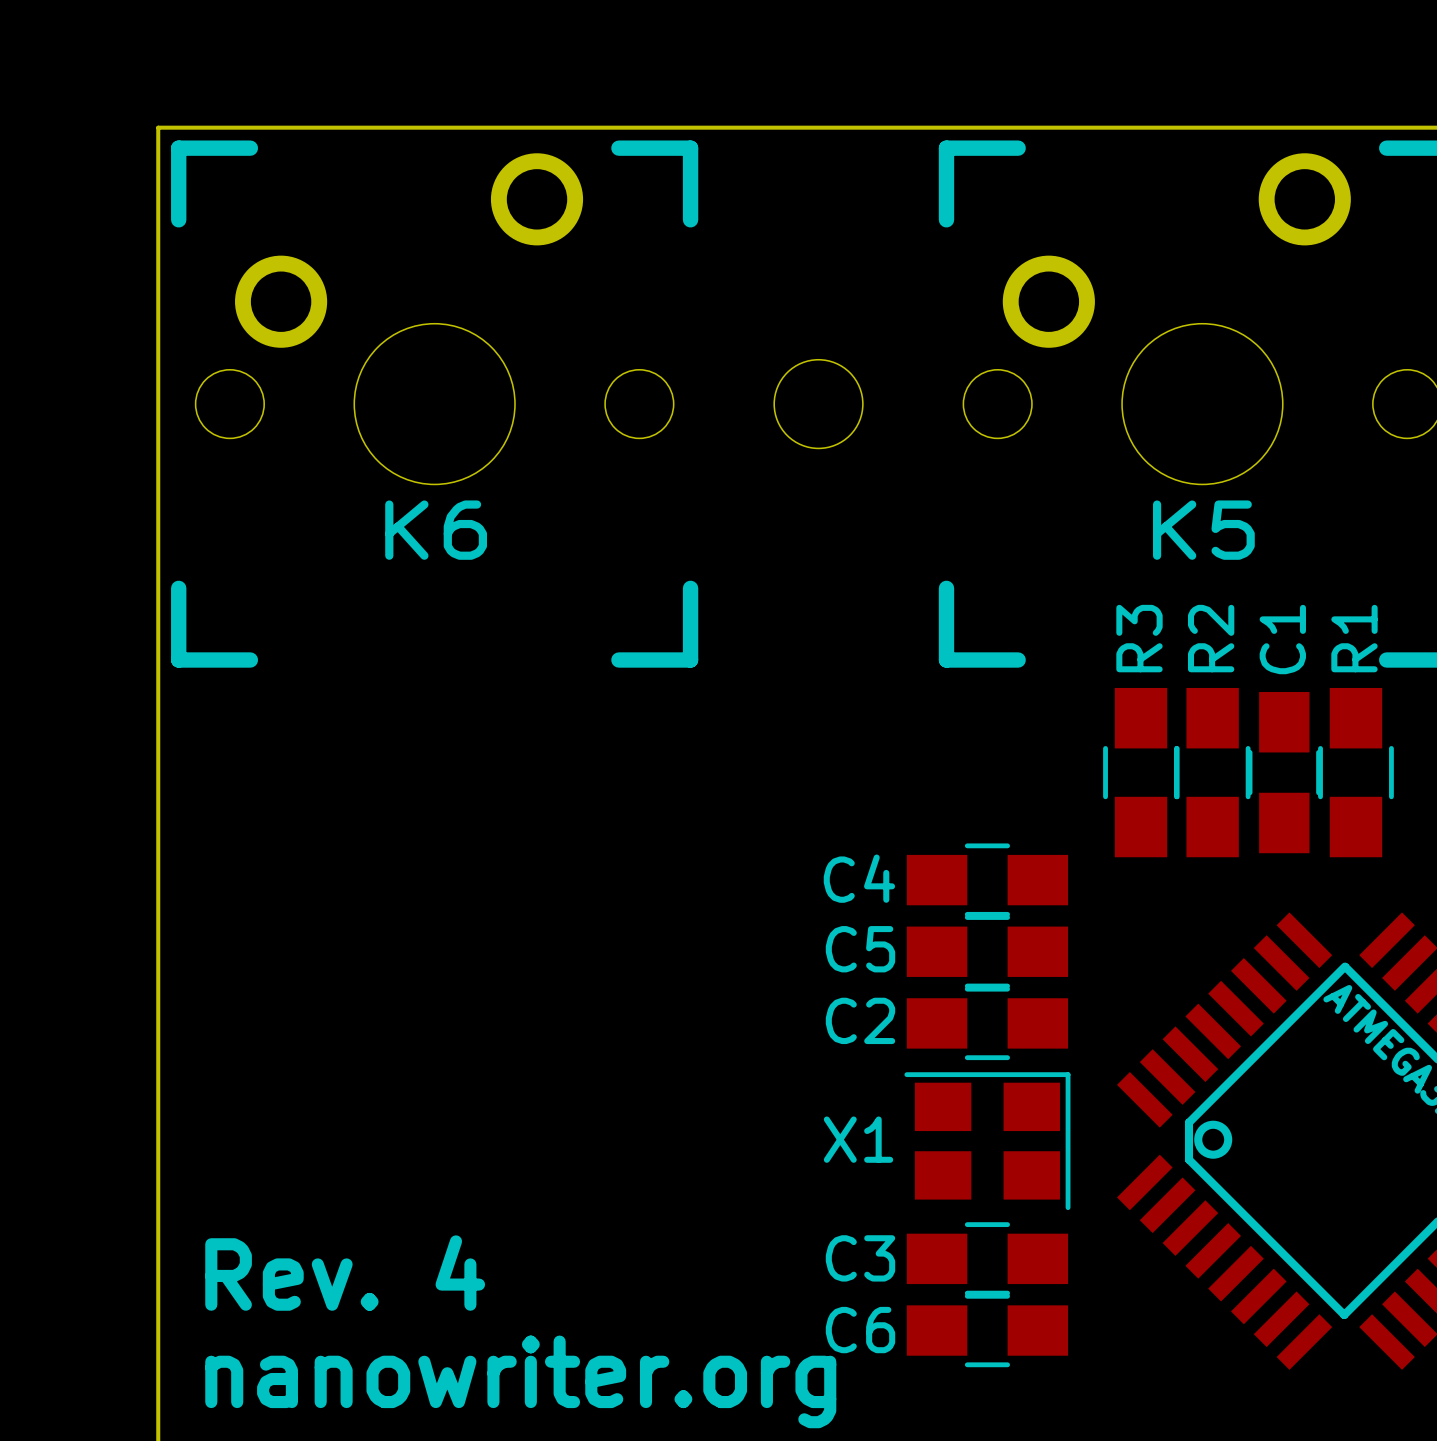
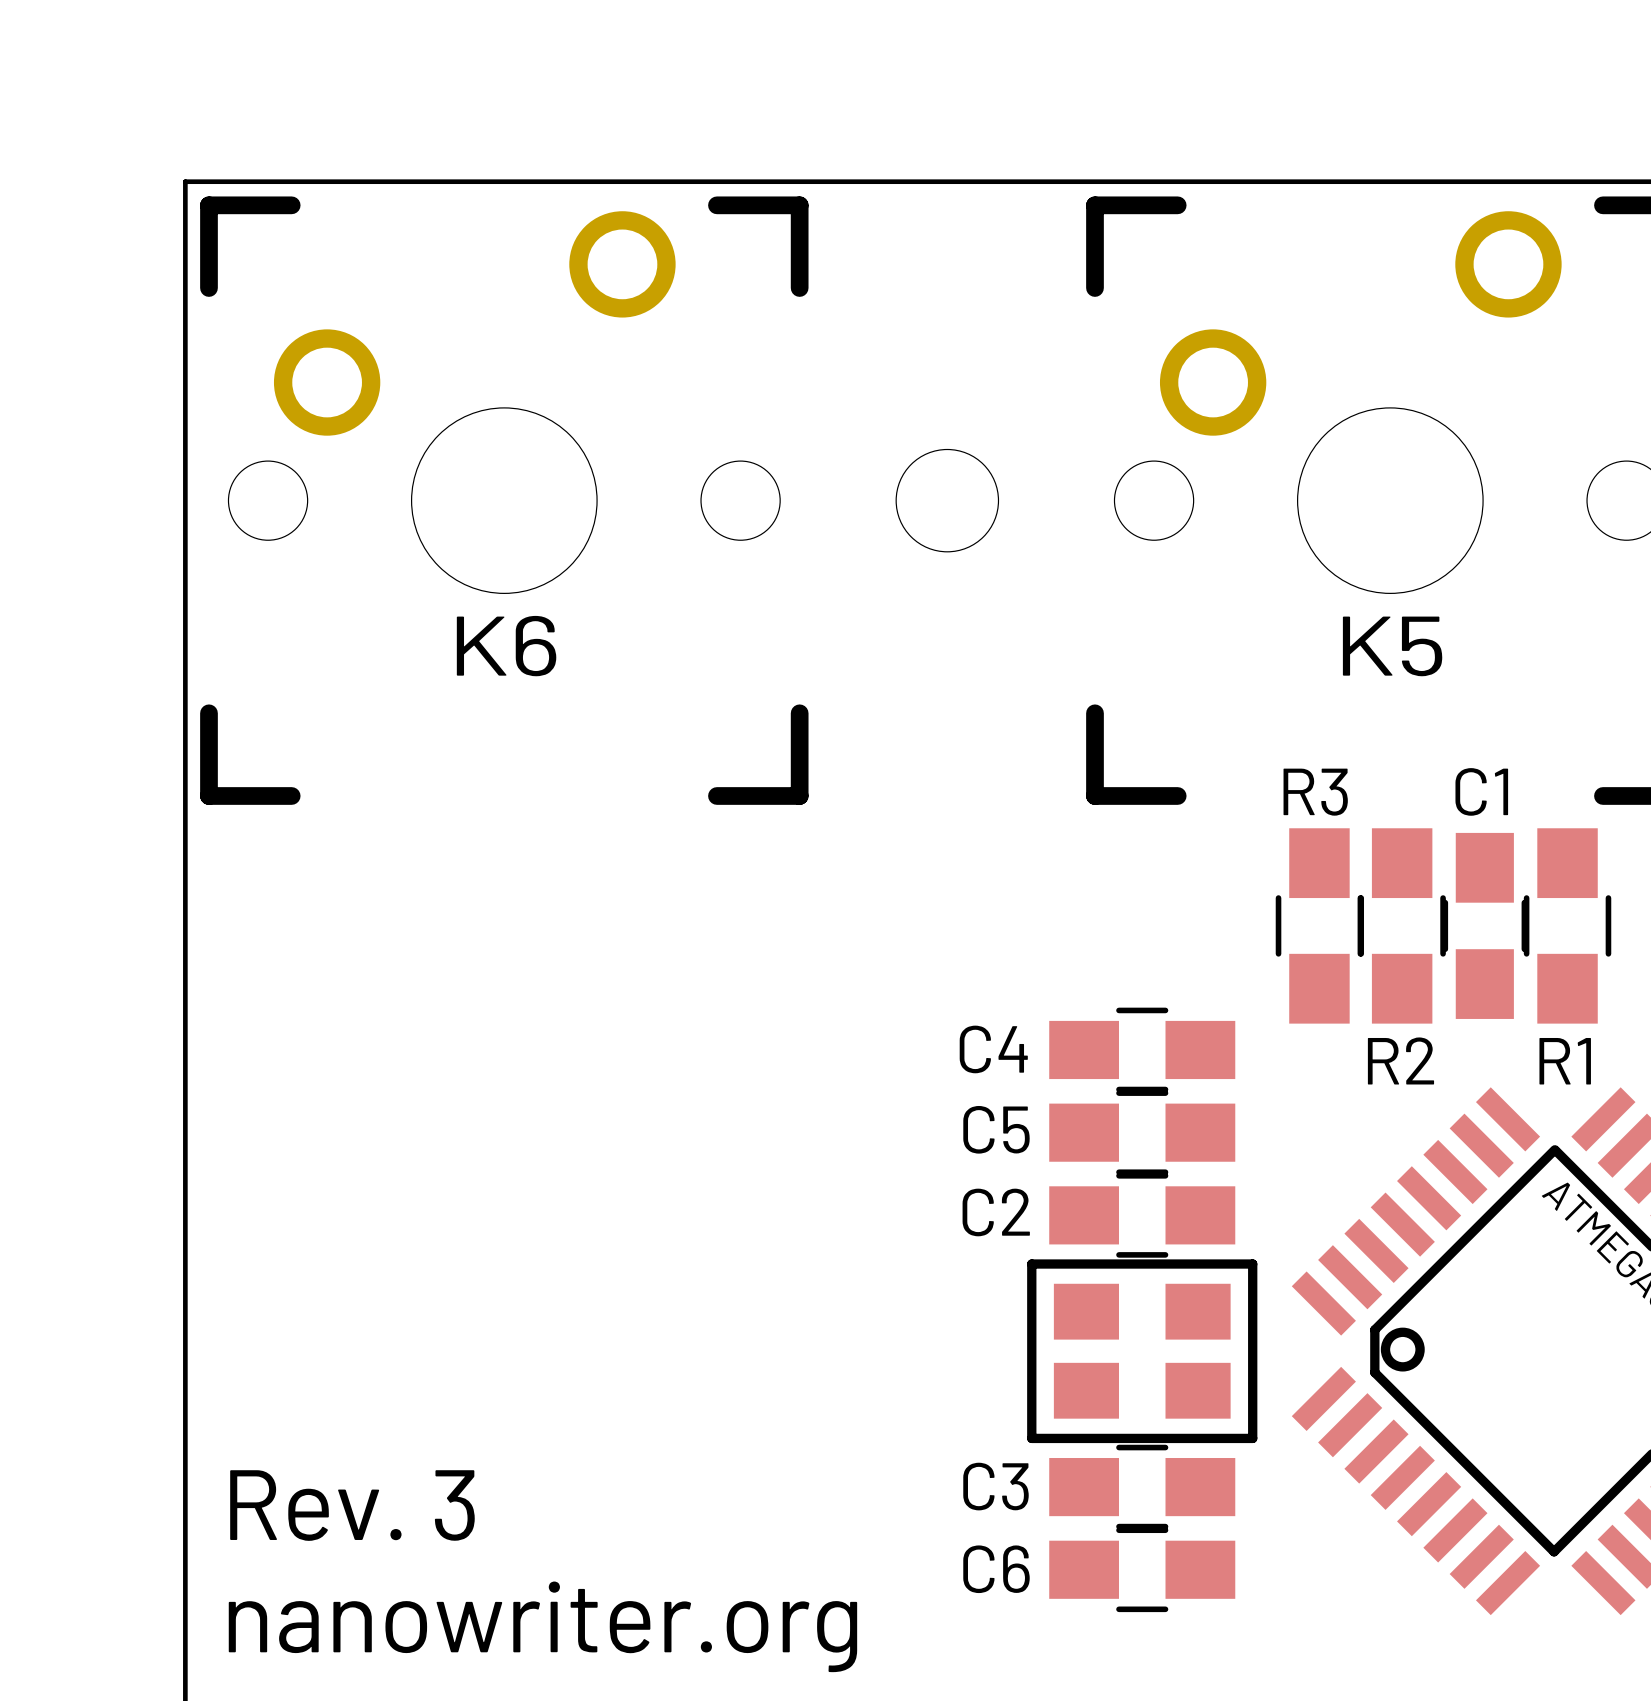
R3 name rotation: 0° (1139, 638) -> 90° clockwise (1315, 792)
R2 name rotation: 0° (1211, 638) -> 90° clockwise (1400, 1060)
R2 name position: R2 (1211, 638) -> R2 (1400, 1060)
R1 name rotation: 0° (1354, 638) -> 90° clockwise (1565, 1061)
R1 name position: R1 (1354, 638) -> R1 (1565, 1061)
C1 name rotation: 0° (1282, 639) -> 90° clockwise (1481, 791)
X1: (987, 1141) -> none
part: none -> (1142, 1351)
text: Rev. 4 (345, 1273) -> Rev. 3 (352, 1505)

